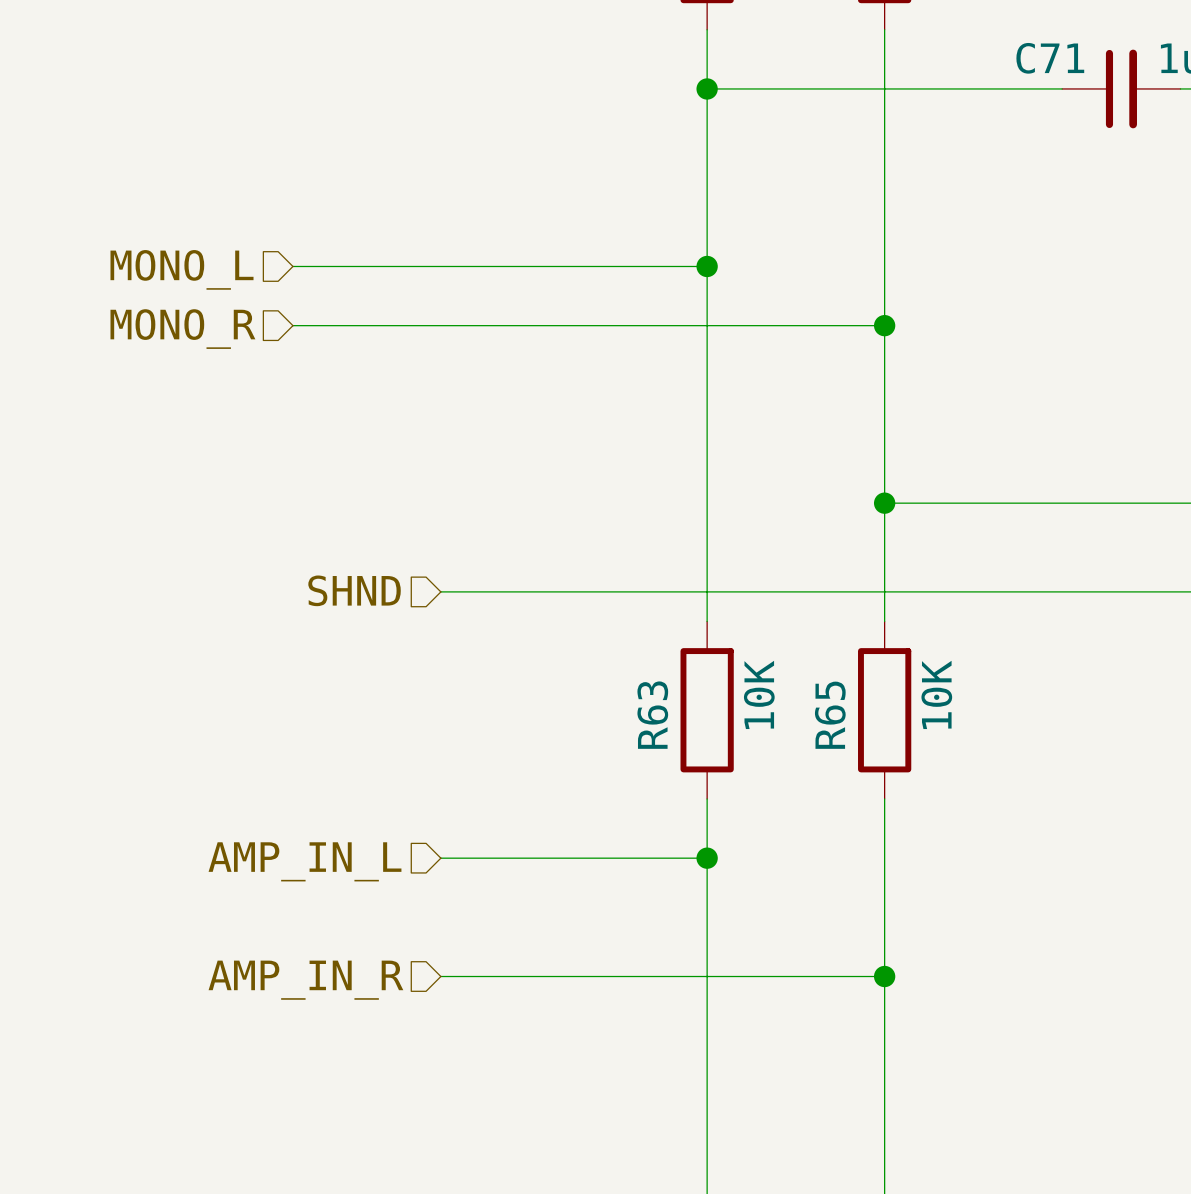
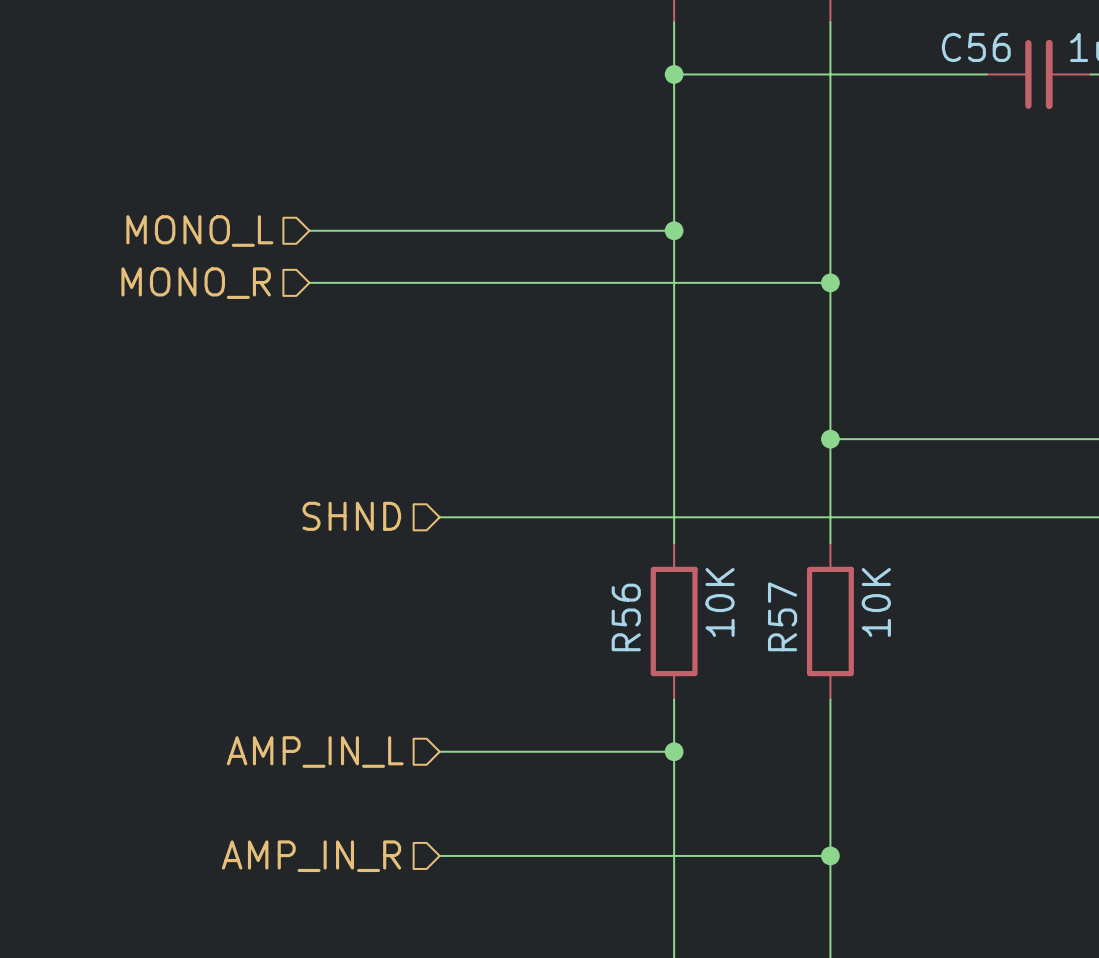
C71 name: C71 (1050, 58) -> C56 (976, 47)
R63 name: R63 (652, 715) -> R56 (626, 617)
R65 name: R65 (830, 715) -> R57 (782, 616)

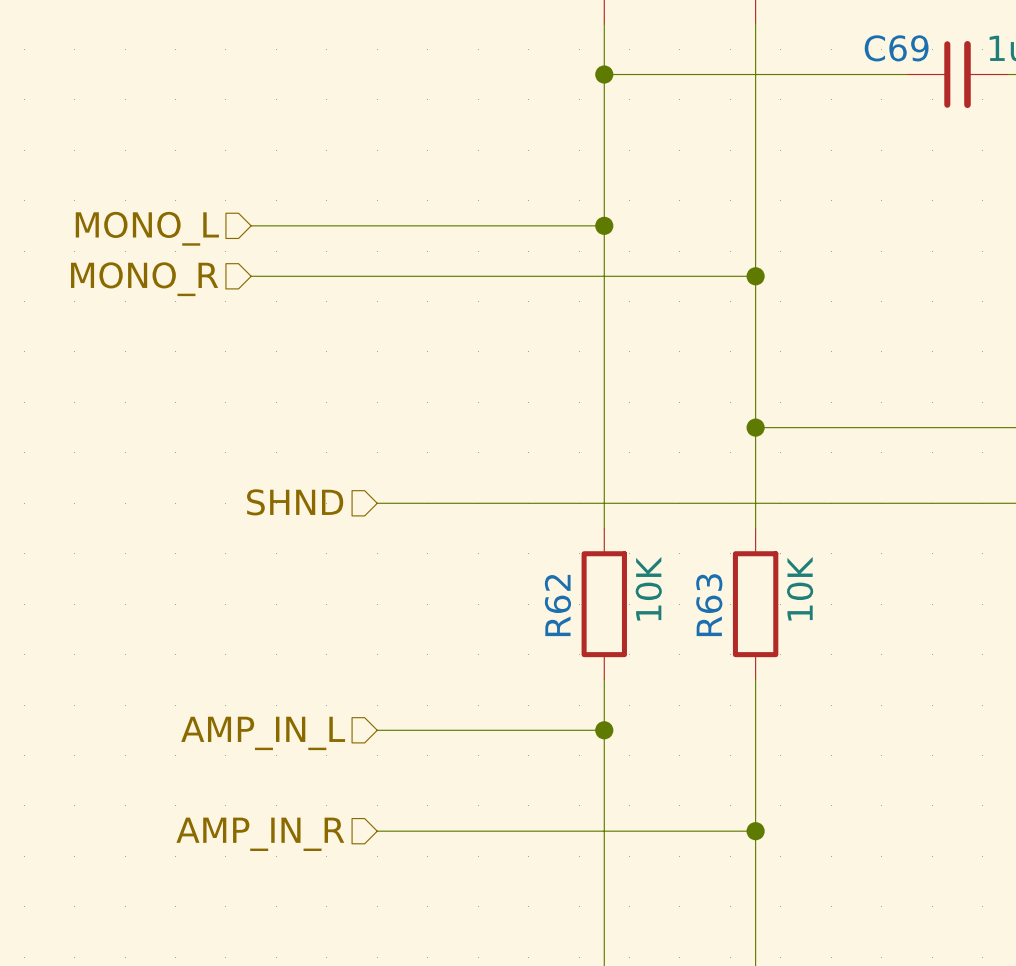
C56 name: C56 (976, 47) -> C69 (896, 48)
R57 name: R57 (782, 616) -> R63 (709, 605)
R56 name: R56 (626, 617) -> R62 (557, 605)

